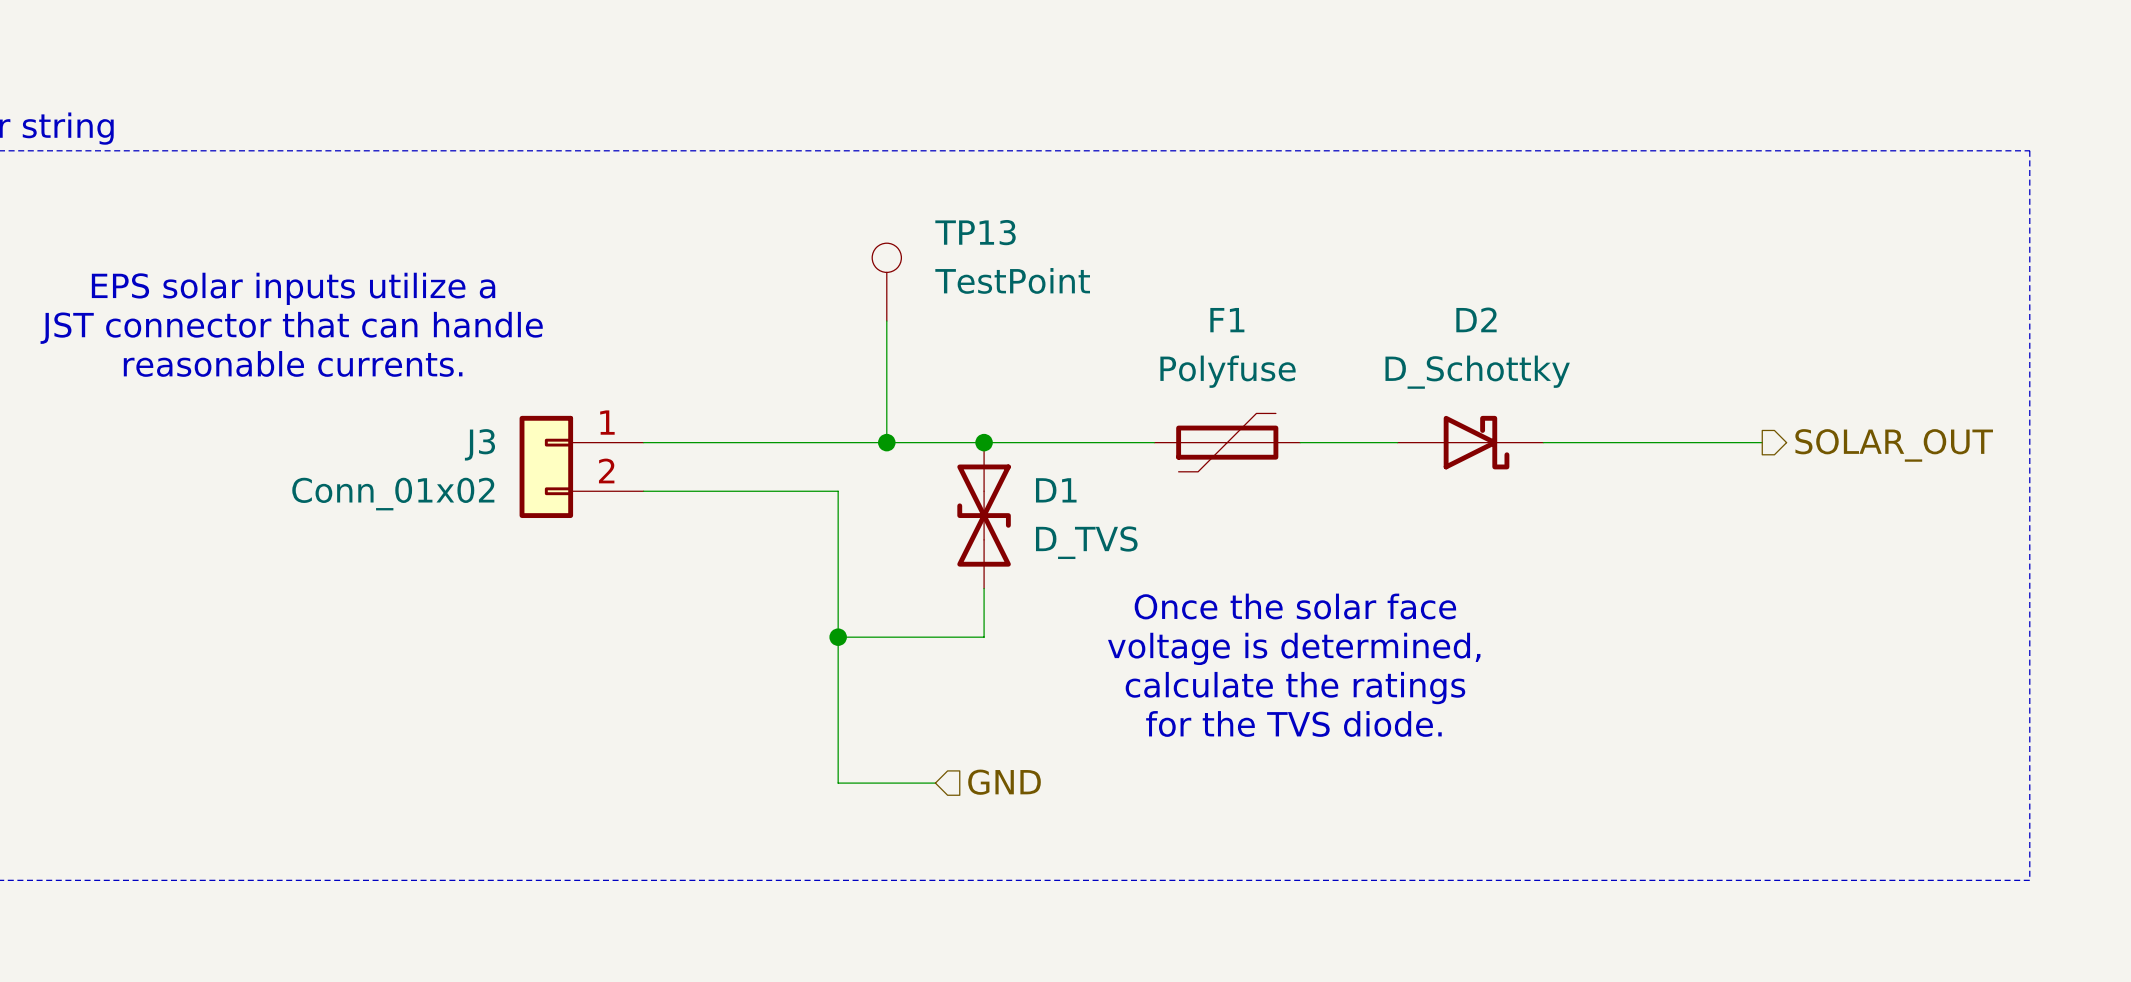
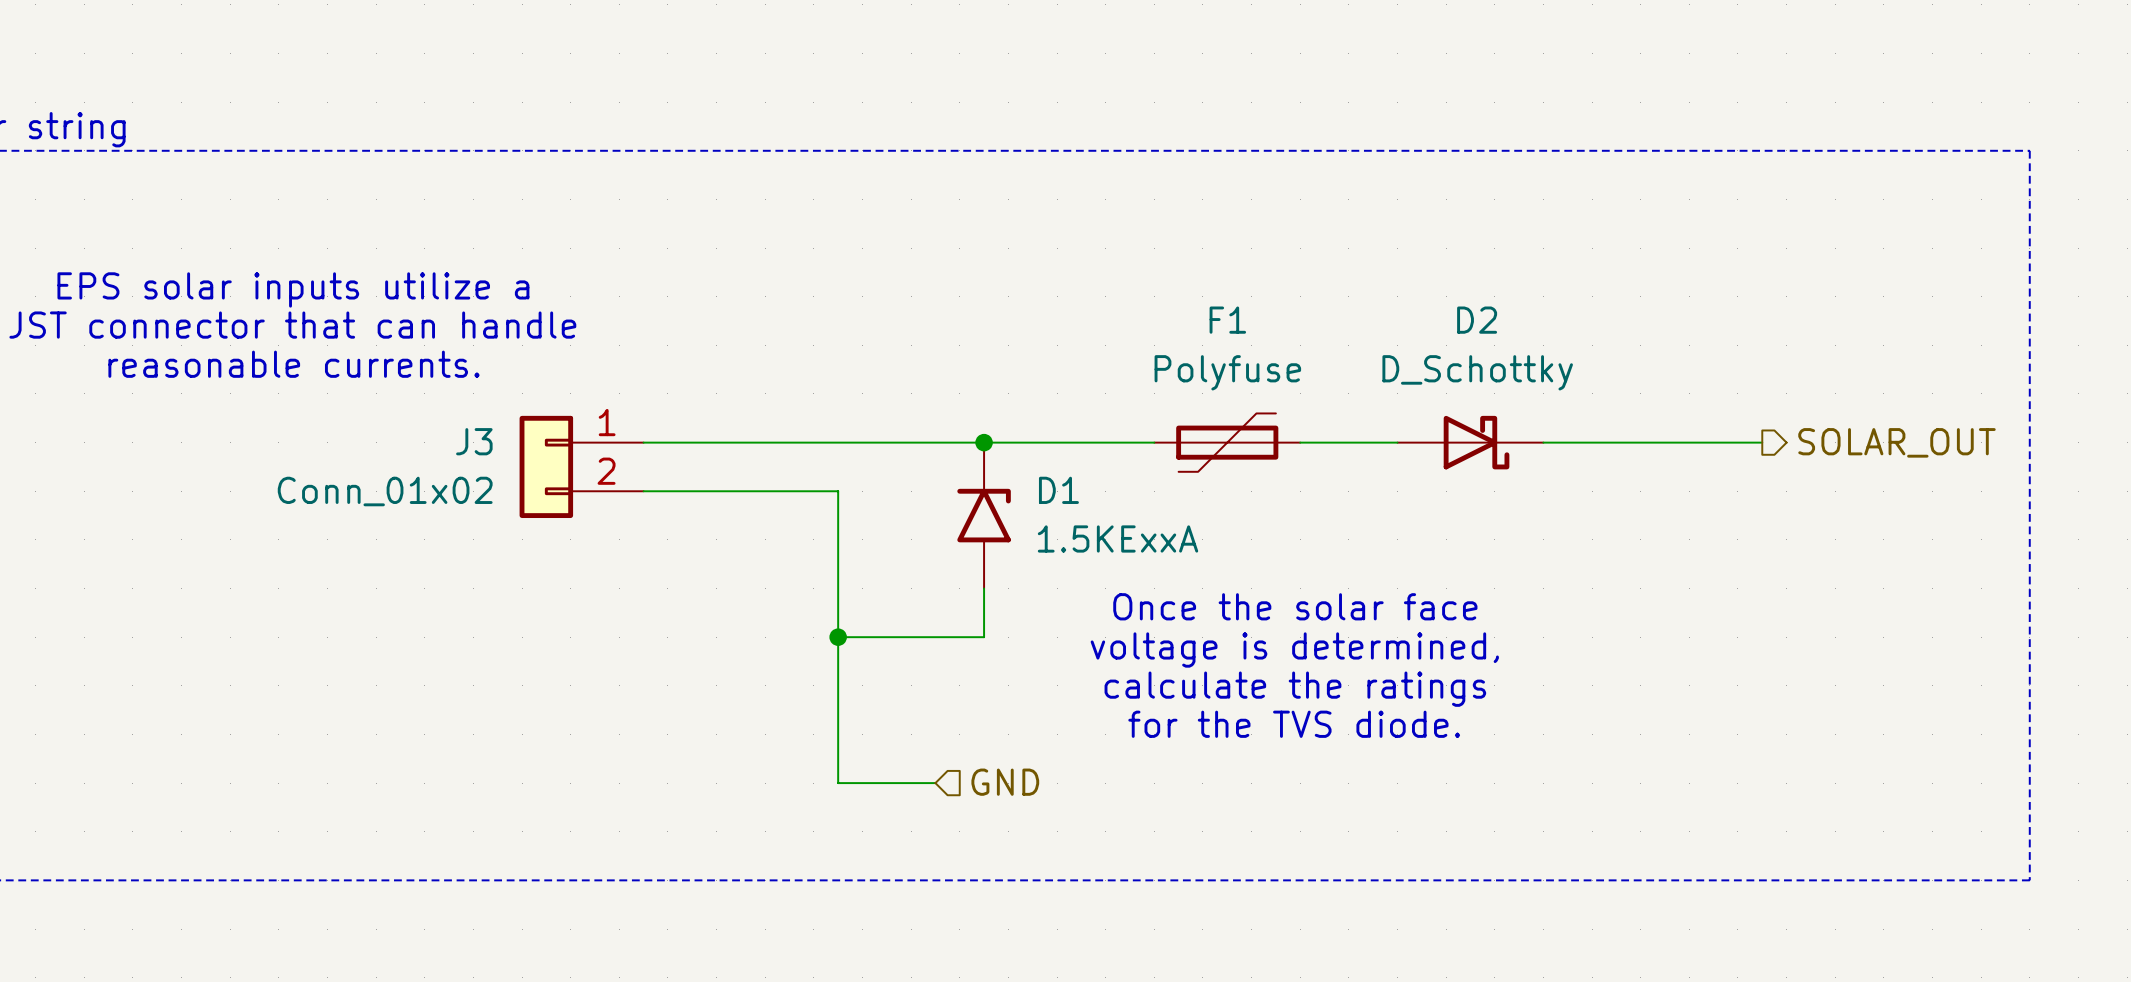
TP13: TestPoint (886, 282) -> none
wire: (886, 321) (886, 442) -> none
junction: (886, 442) -> none
D1 symbol: [957, 442, 1011, 589] -> [957, 442, 1011, 589]
D1 value: D_TVS (1086, 542) -> 1.5KExxA (1118, 538)

